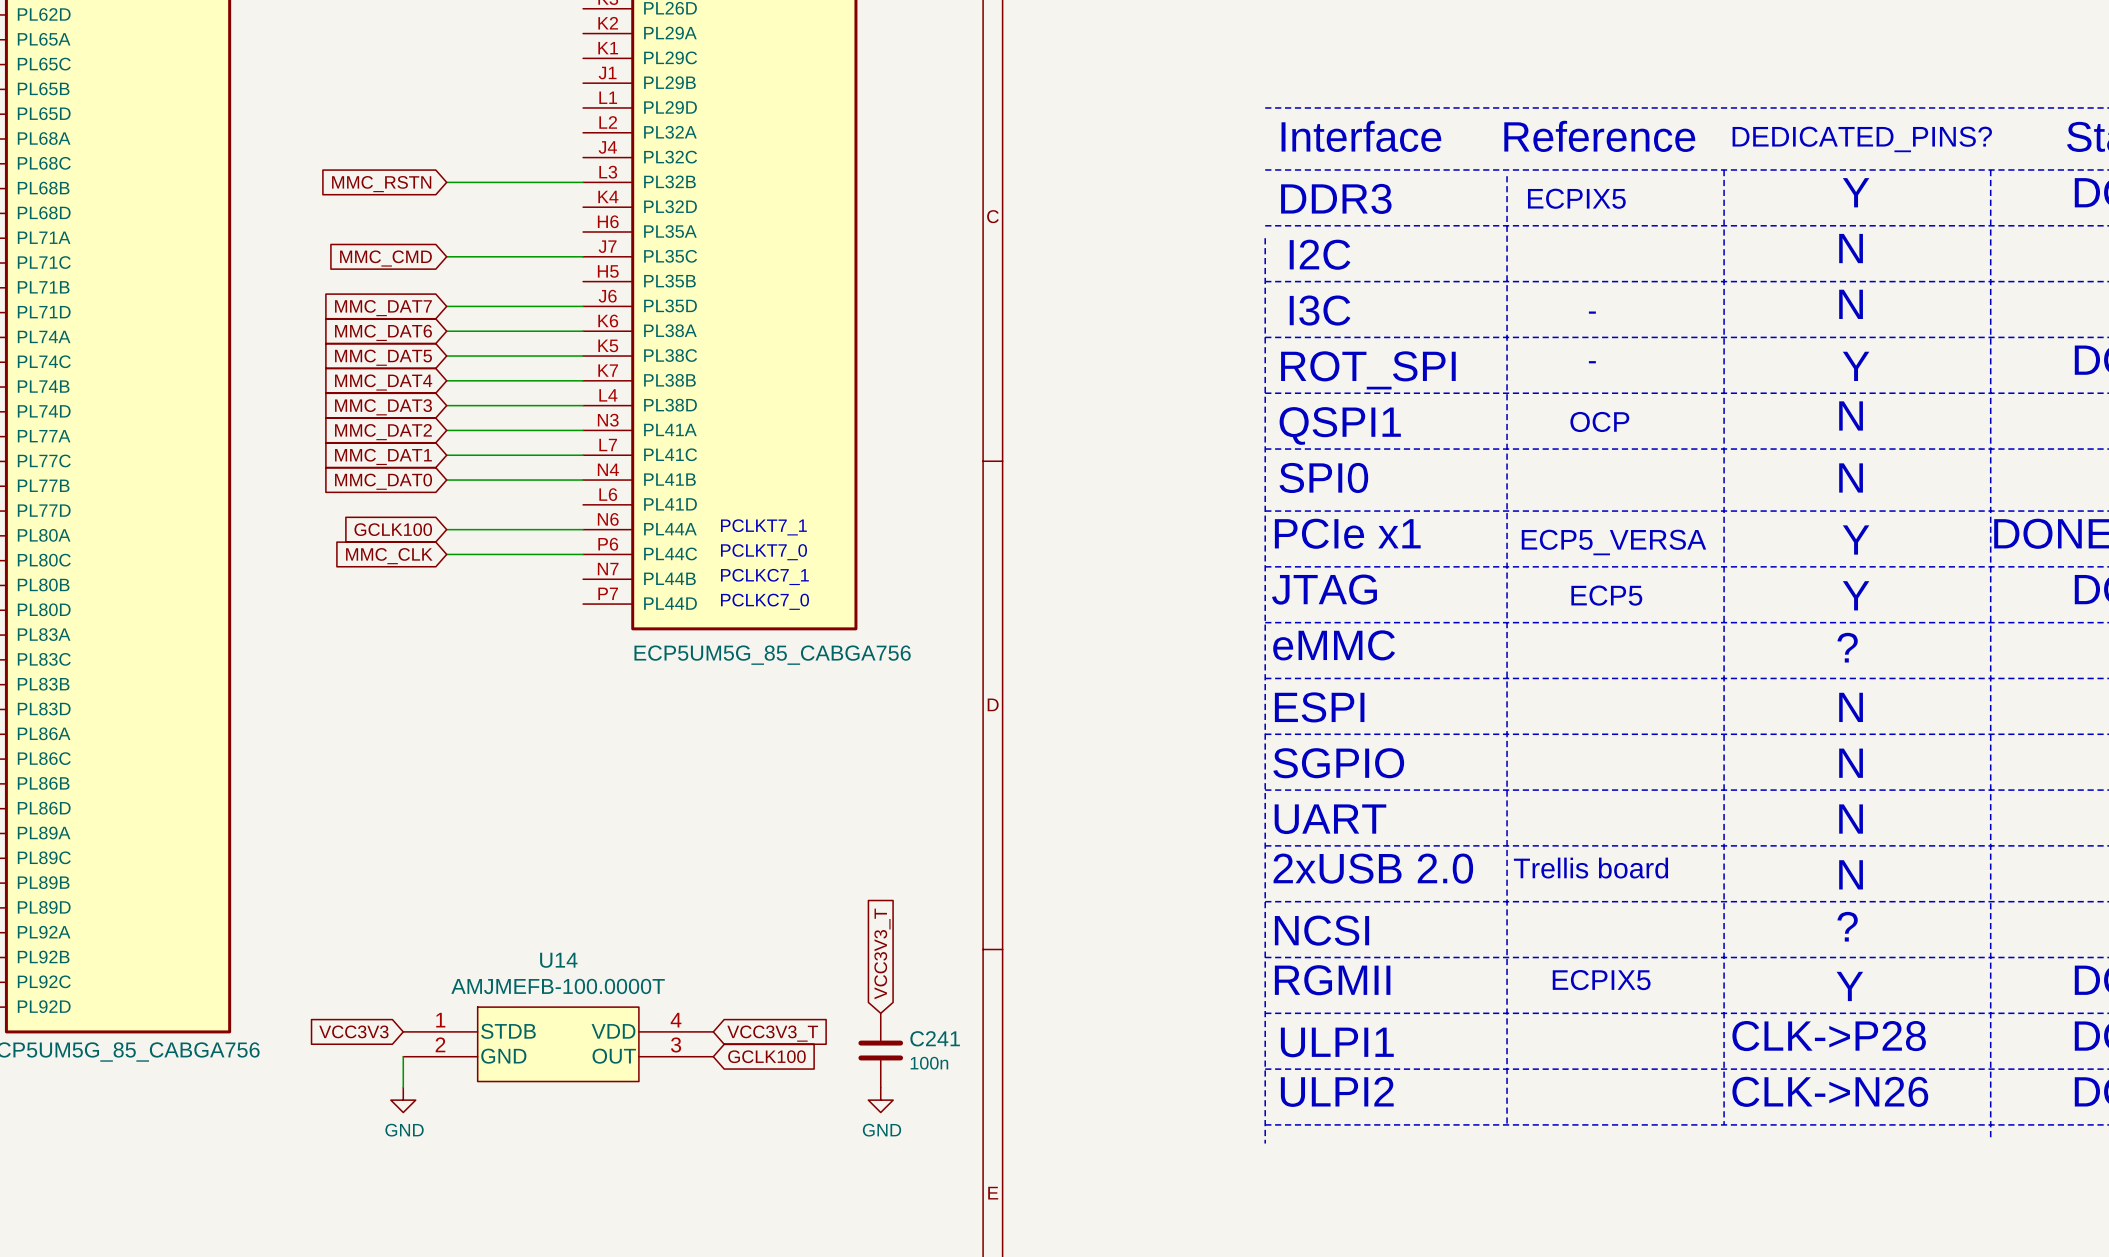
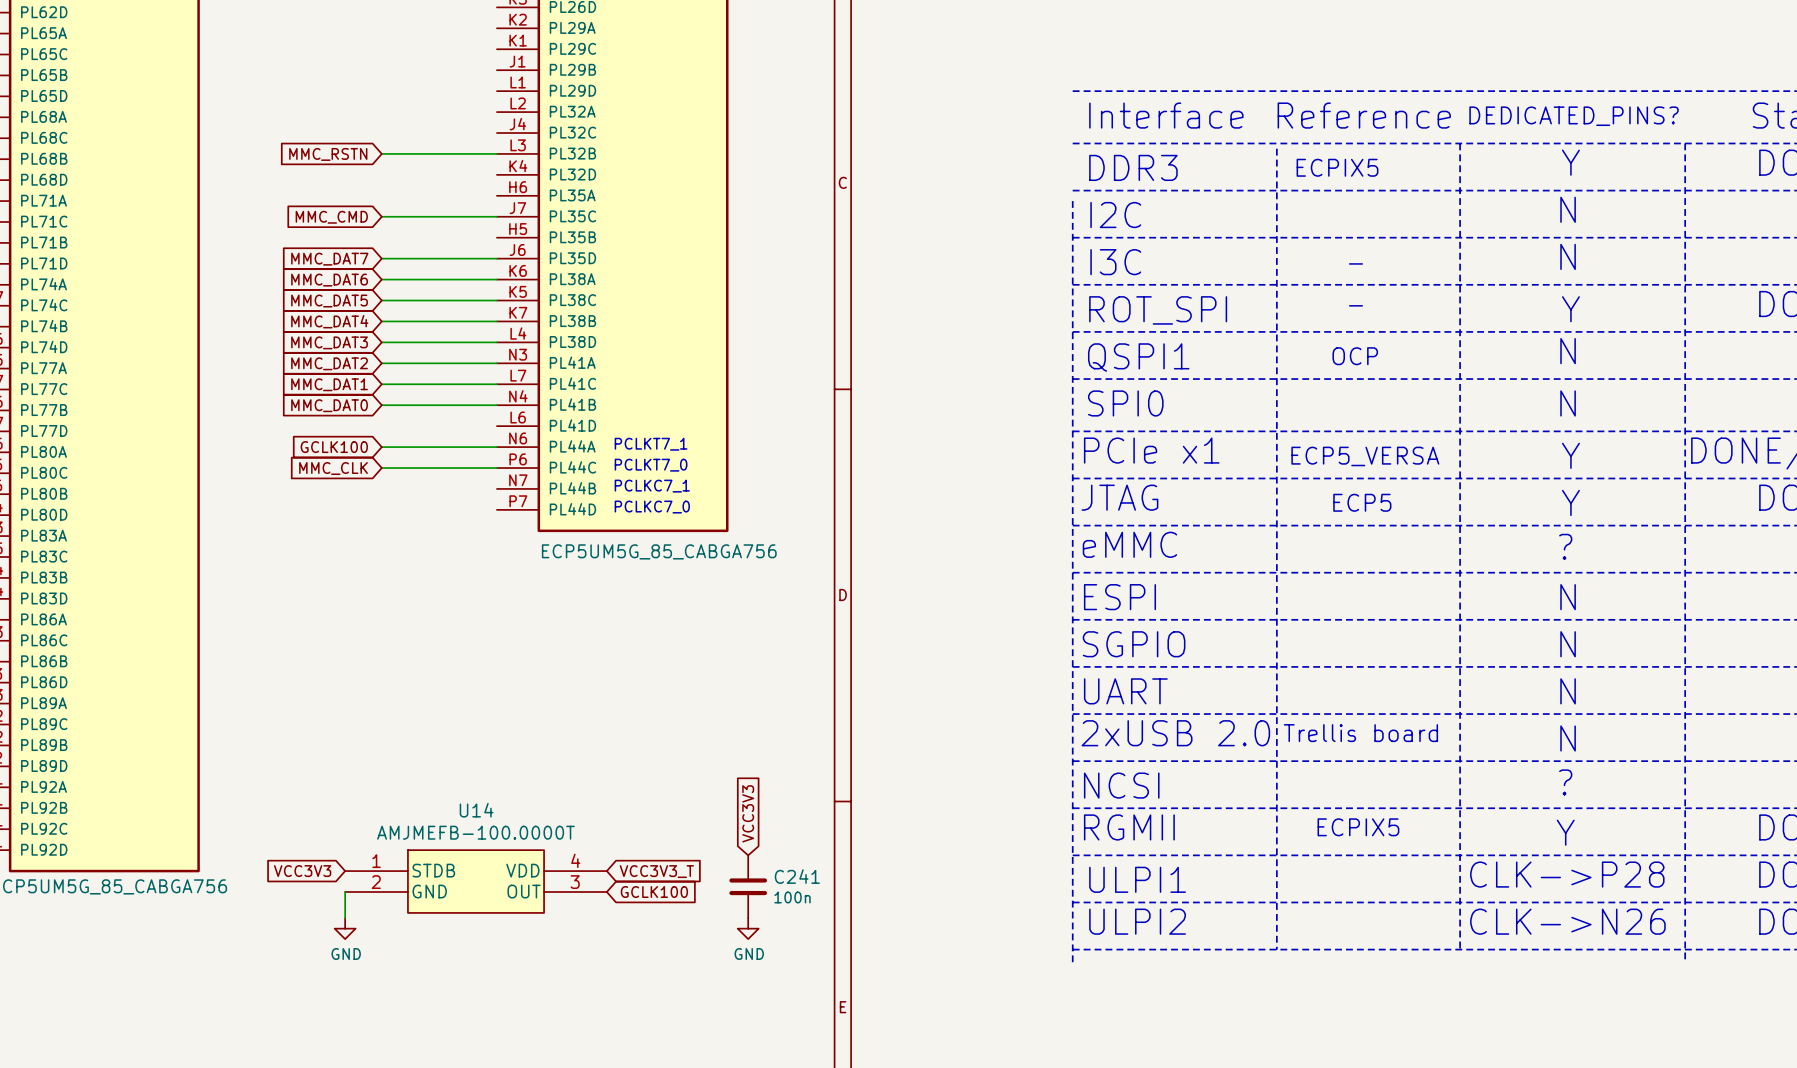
global label: VCC3V3_T (882, 953) -> VCC3V3 (748, 813)

